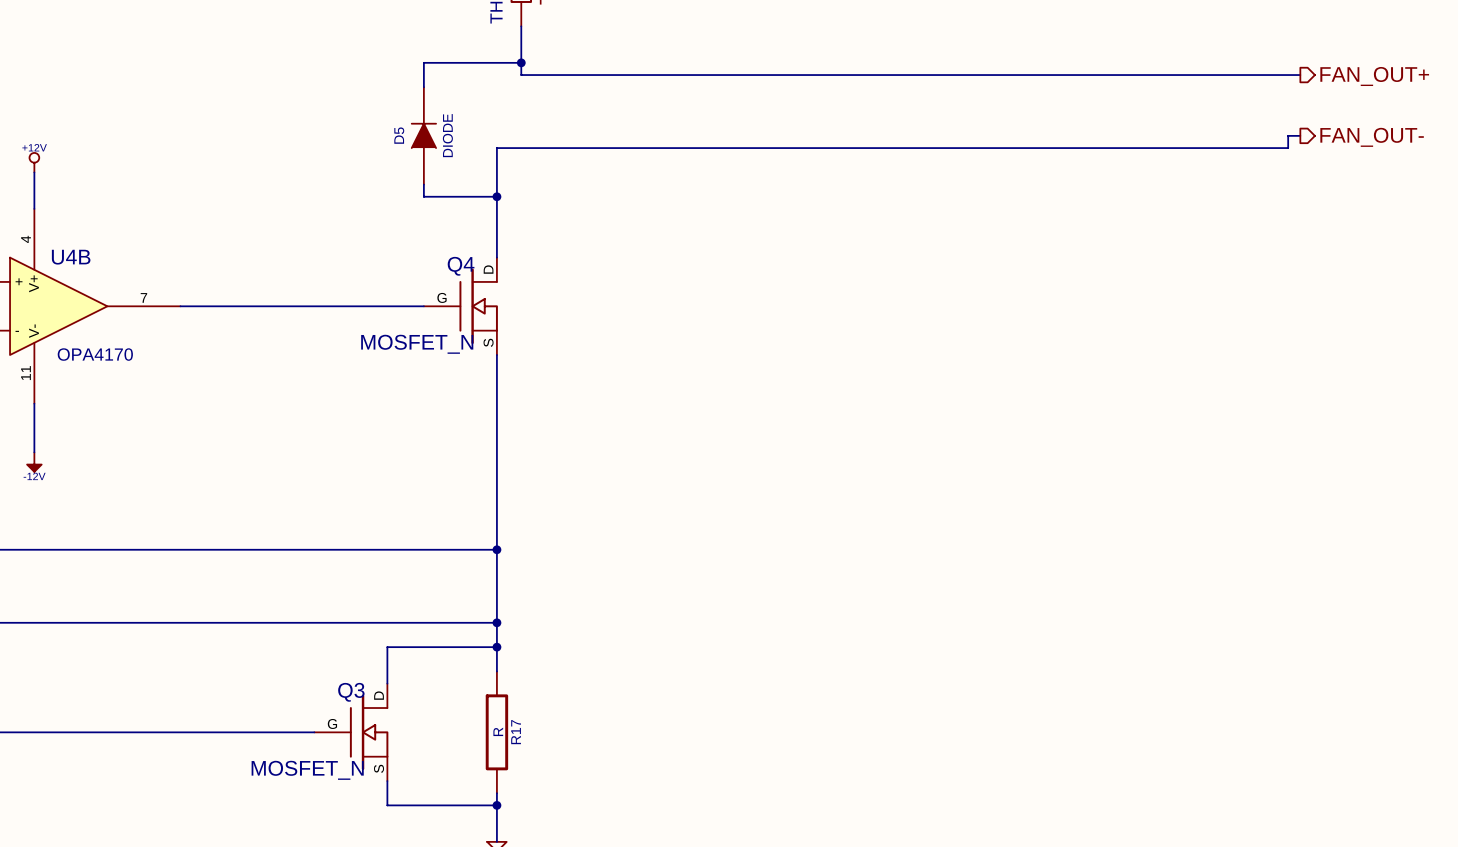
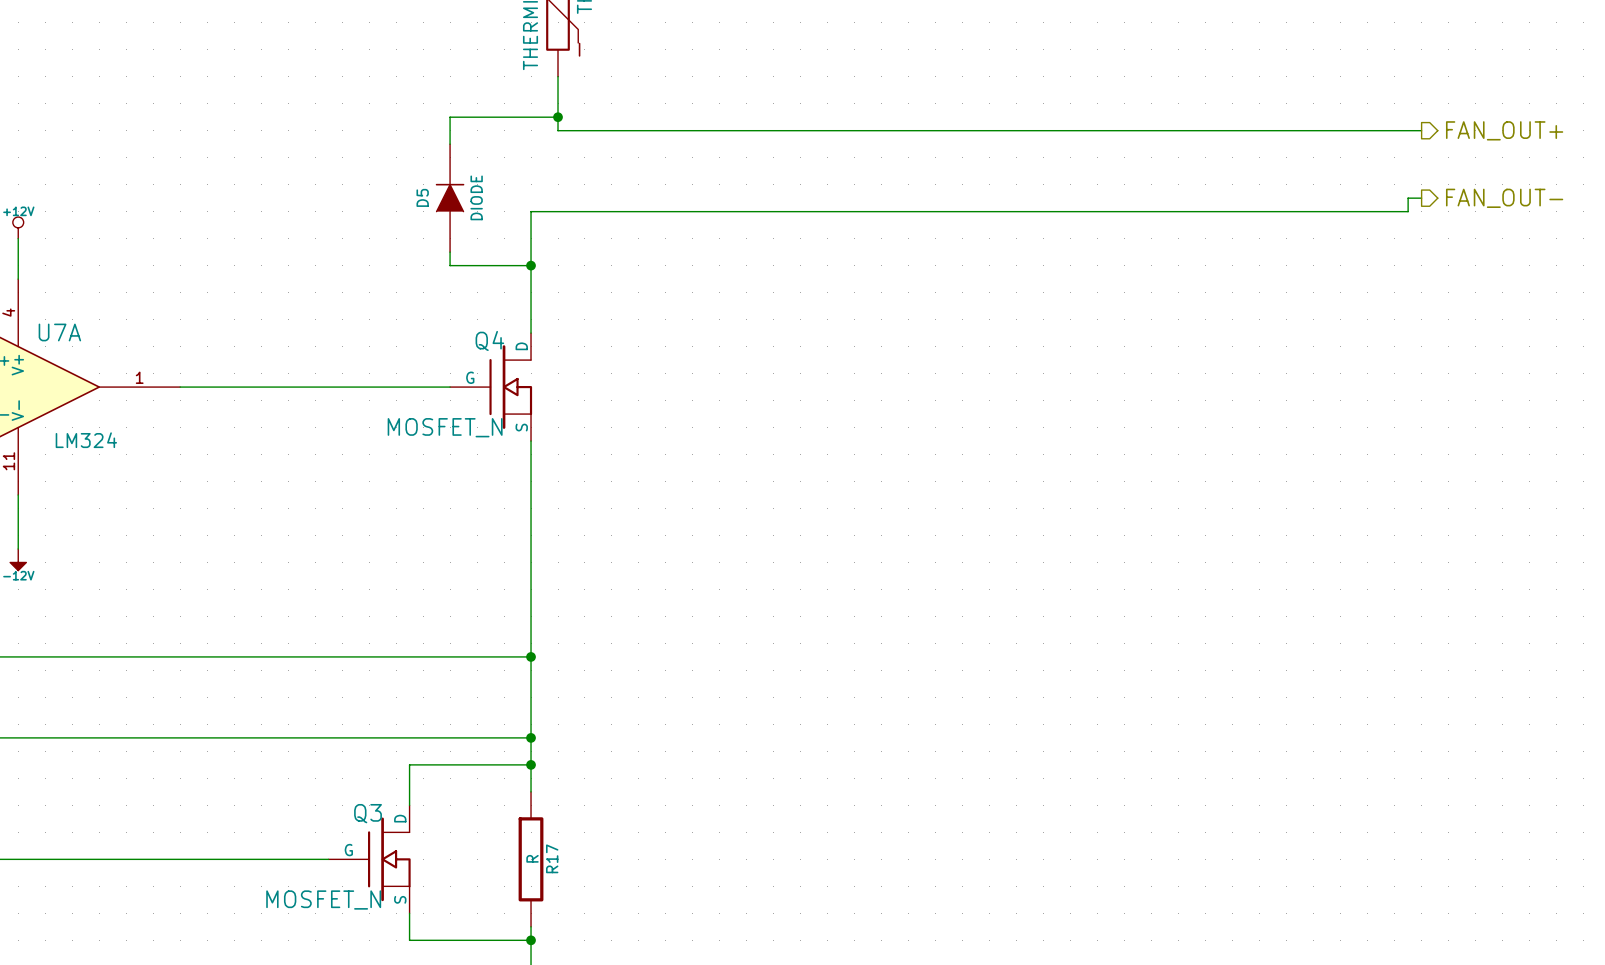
U4B name: U4B (71, 257) -> U7A (59, 332)
U4B pin number: 7 (143, 297) -> 1 (139, 377)
U4B value: OPA4170 (95, 354) -> LM324 (86, 440)

